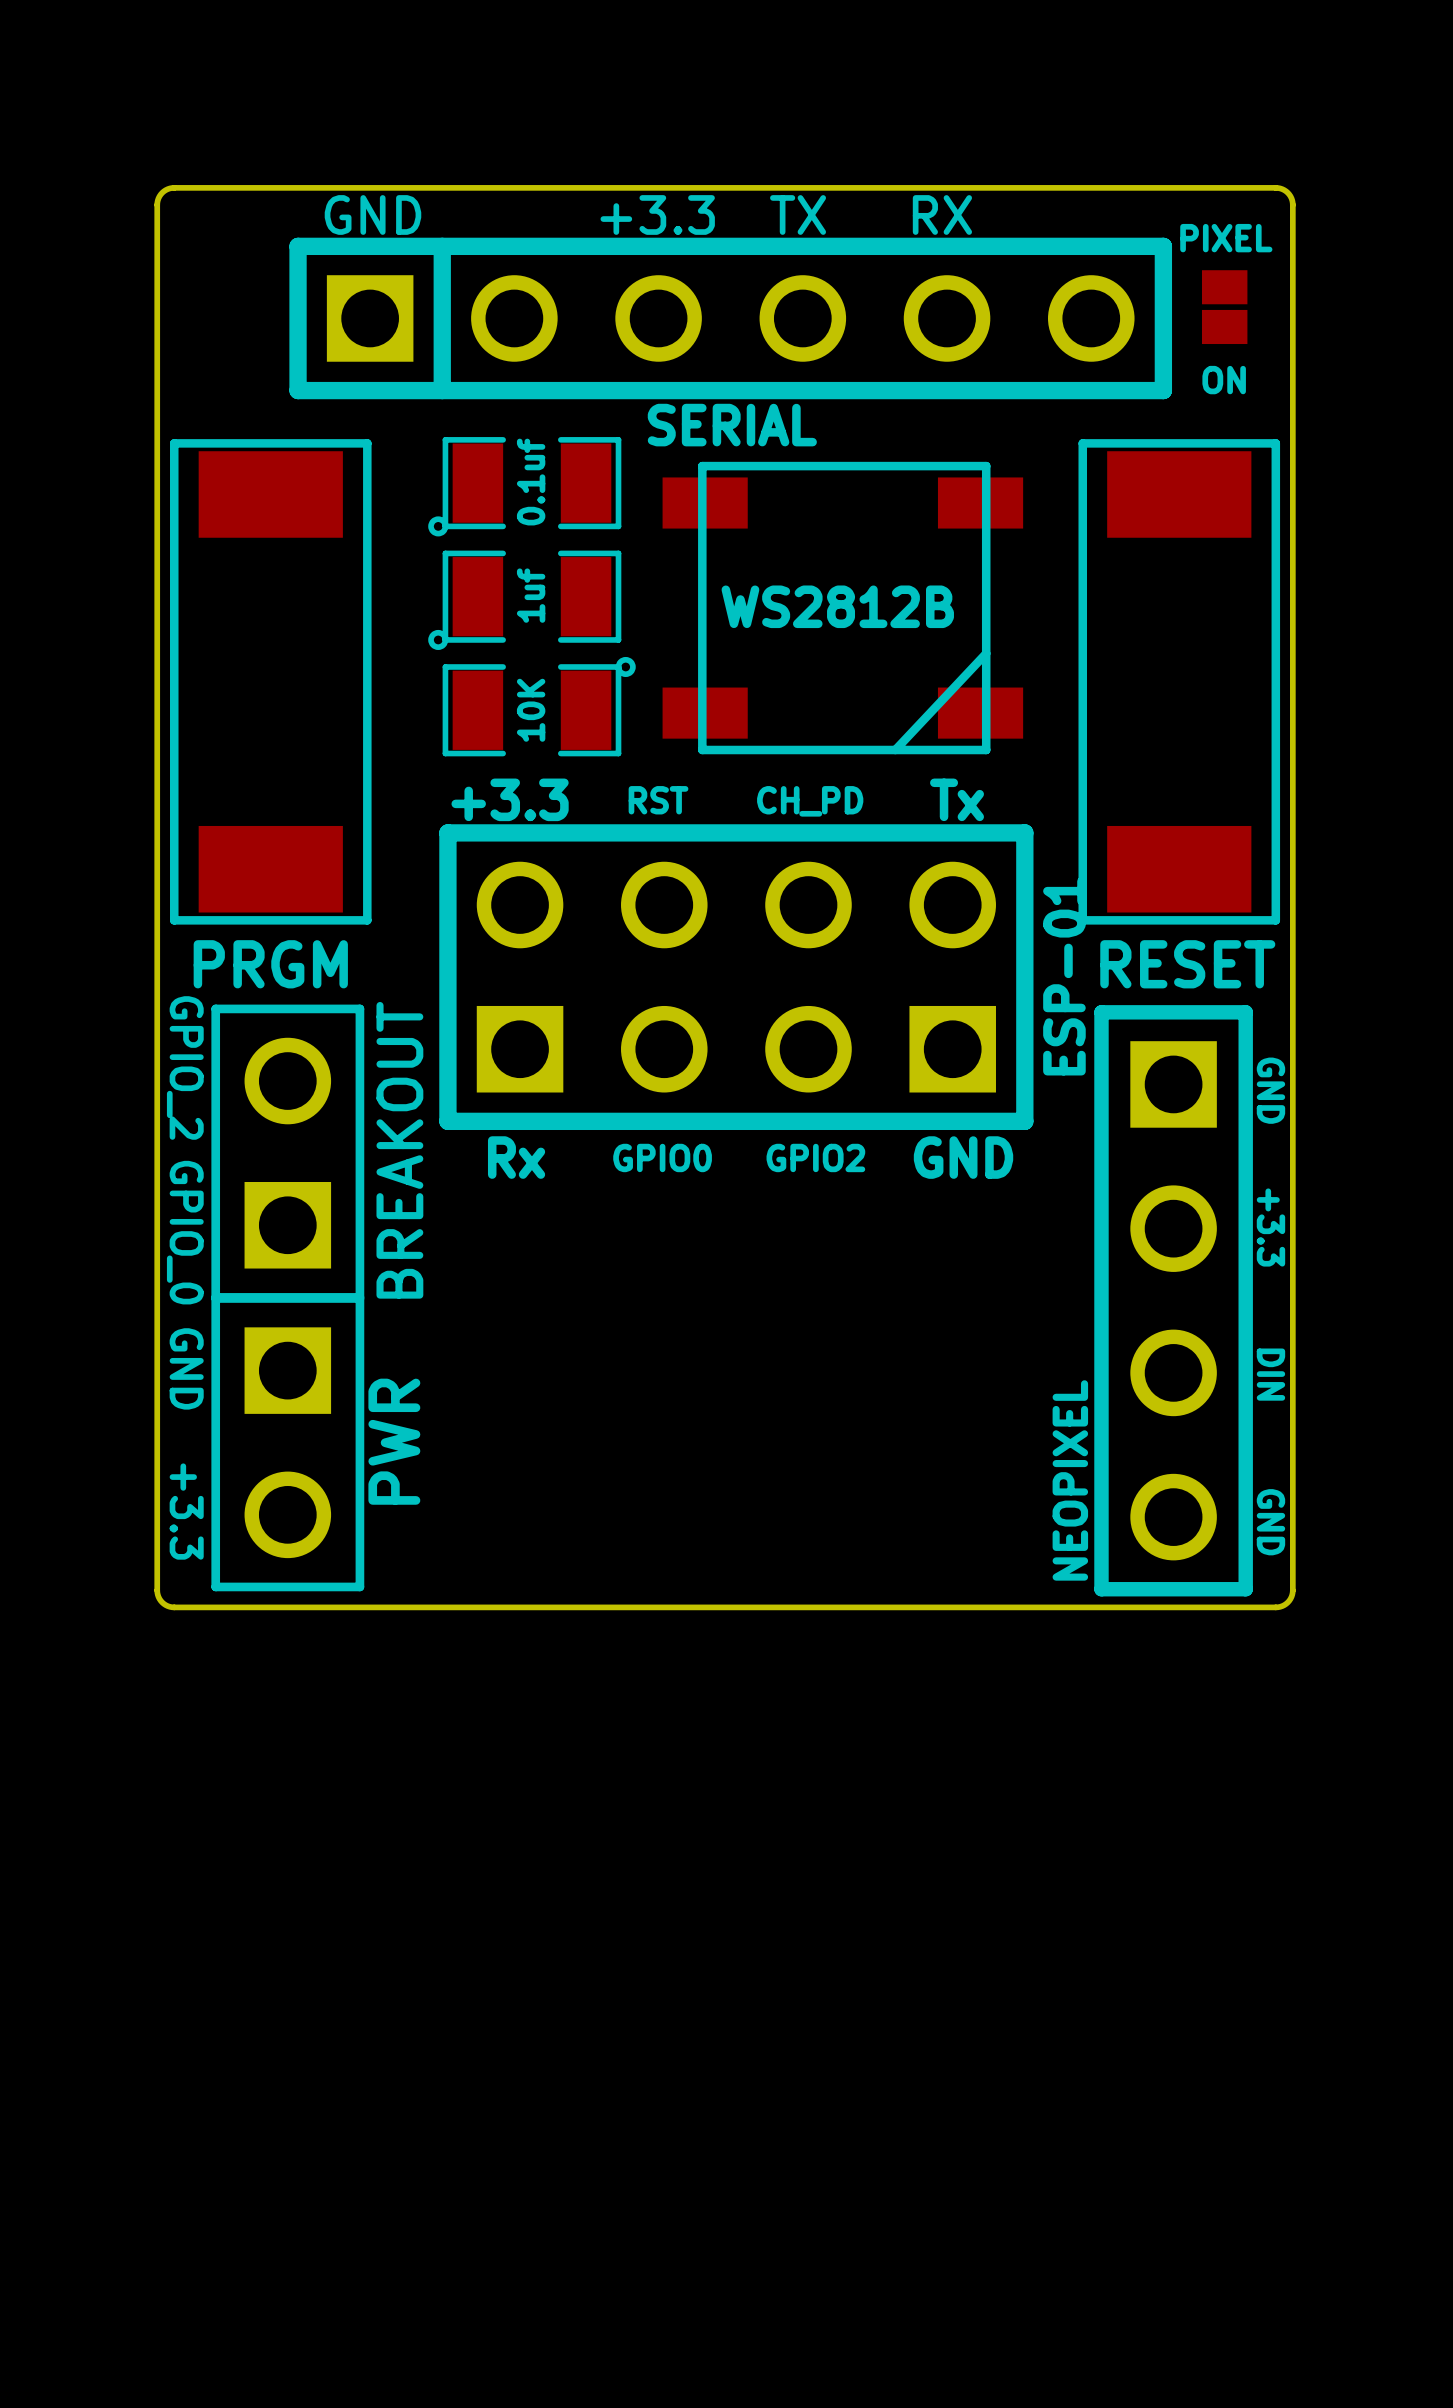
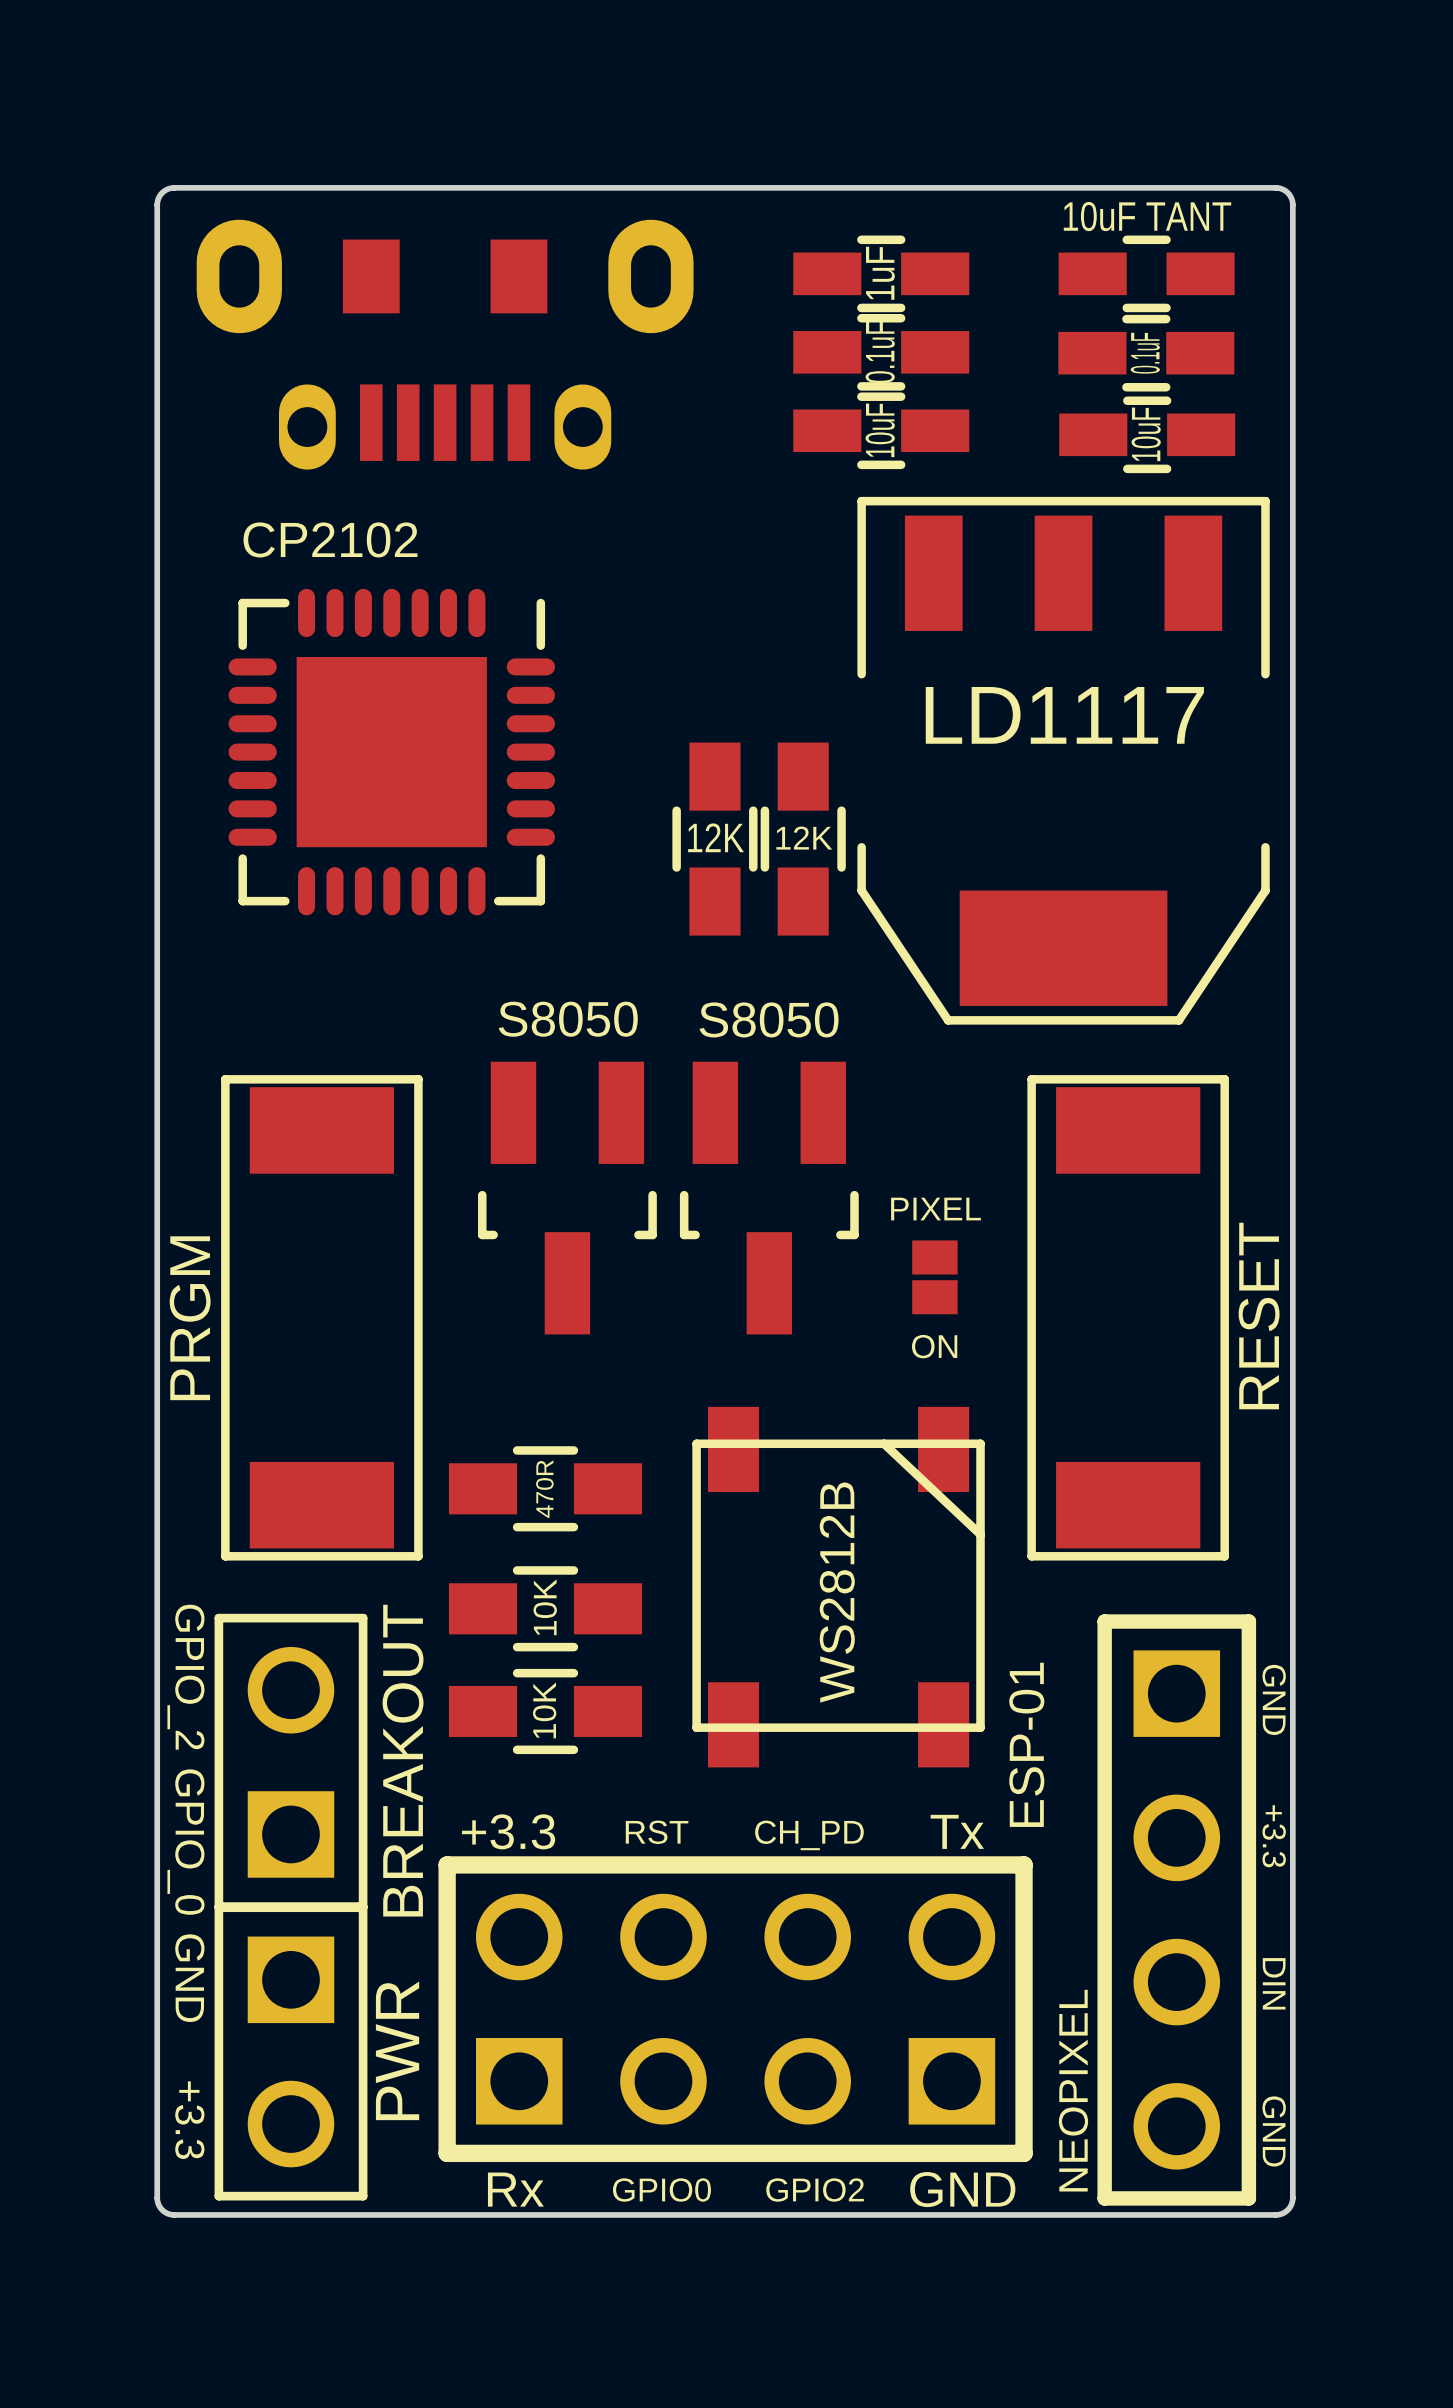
text: GND (372, 214) -> none
text: +3.3 (657, 214) -> none
text: TX (798, 214) -> none
text: RX (942, 214) -> none
text position: PIXEL (1226, 238) -> PIXEL (936, 1209)
part: none -> 1uF (881, 273)
part: none -> 10uF TANT (1146, 273)
part position: (1224, 307) -> (934, 1277)
part: SERIAL (730, 318) -> none
part: none -> (445, 344)
part: none -> 0.1uF (881, 352)
part: none -> 0.1uF (1146, 353)
text position: ON (1224, 380) -> ON (934, 1346)
part: none -> 10uF (881, 430)
part: none -> 10uF (1147, 434)
part: 0.1uf (524, 486) -> none
part: 1uf (524, 600) -> none
part rotation: 0° (842, 608) -> 90° counterclockwise (838, 1587)
part position: (842, 608) -> (838, 1587)
part position: (270, 681) -> (321, 1317)
part: RESET (1179, 681) -> none
part: 10K (539, 706) -> none
part: none -> CP2102 (391, 752)
part: none -> LD1117 (1063, 760)
part: none -> 12K (714, 839)
part: none -> 12K (803, 839)
part value rotation: 0° (270, 964) -> 90° counterclockwise (190, 1318)
part value position: PRGM (270, 964) -> PRGM (190, 1318)
part value position: ESP-01 (1064, 976) -> ESP-01 (1026, 1744)
part position: (736, 977) -> (735, 2009)
part footprint: [1094, 1005, 1253, 1597] -> [1027, 1075, 1229, 1561]
text position: GPIO_2 (185, 1067) -> GPIO_2 (185, 1677)
text: GND (1270, 1090) -> none
part position: (287, 1153) -> (290, 1762)
part: none -> S8050 (567, 1198)
part: none -> S8050 (769, 1198)
text: +3.3 (1270, 1227) -> none
text position: GPIO_0 (185, 1232) -> GPIO_0 (185, 1842)
text: GND (186, 1368) -> none
text position: DIN (1270, 1374) -> DIN (1274, 1983)
part position: (287, 1442) -> (290, 2051)
part value: NEOPIXEL (1070, 1480) -> RESET (1259, 1316)
part: none -> 470R (545, 1488)
text: +3.3 (186, 1511) -> none
text position: GND (1270, 1522) -> GND (1274, 1699)
board edge: (157, 1590) (162, 1602) (174, 1607) (1275, 1607) (1287, 1602) (1292, 1590) -> (157, 1590) (157, 2197) (162, 2209) (174, 2214) (1275, 2214) (1284, 2212) (1290, 2206) (1292, 2197) (1292, 1590)
part: none -> 10K (545, 1608)
part: none -> 10K (545, 1711)
text: none -> +3.3 (1274, 1836)
part: none -> NEOPIXEL (1176, 1909)
text: none -> GND (189, 1978)
text: none -> +3.3 (189, 2120)
text: none -> GND (1274, 2131)

